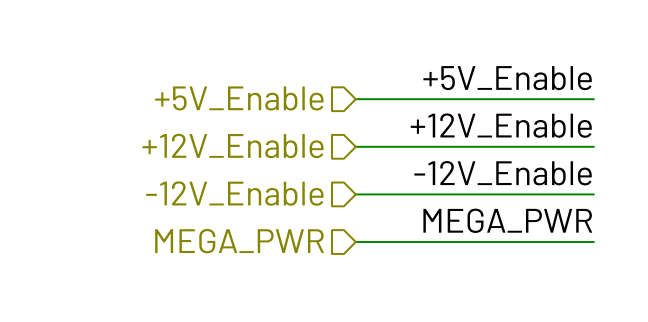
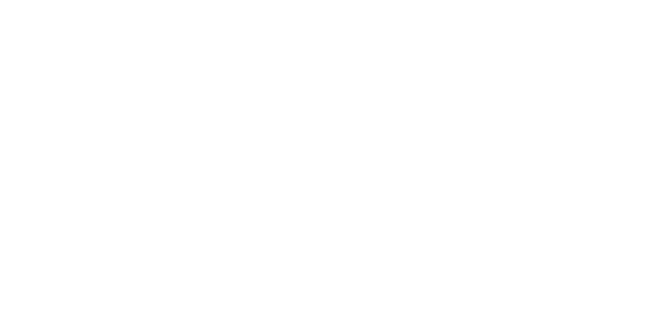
label: +5V_Enable (507, 78) -> none
hierarchical label: +5V_Enable (239, 98) -> none
wire: (355, 99) (593, 99) -> none
label: +12V_Enable (501, 125) -> none
hierarchical label: +12V_Enable (233, 145) -> none
wire: (355, 146) (593, 146) -> none
label: -12V_Enable (503, 173) -> none
hierarchical label: -12V_Enable (234, 193) -> none
wire: (355, 194) (593, 194) -> none
label: MEGA_PWR (507, 220) -> none
hierarchical label: MEGA_PWR (239, 241) -> none
wire: (355, 242) (593, 242) -> none

